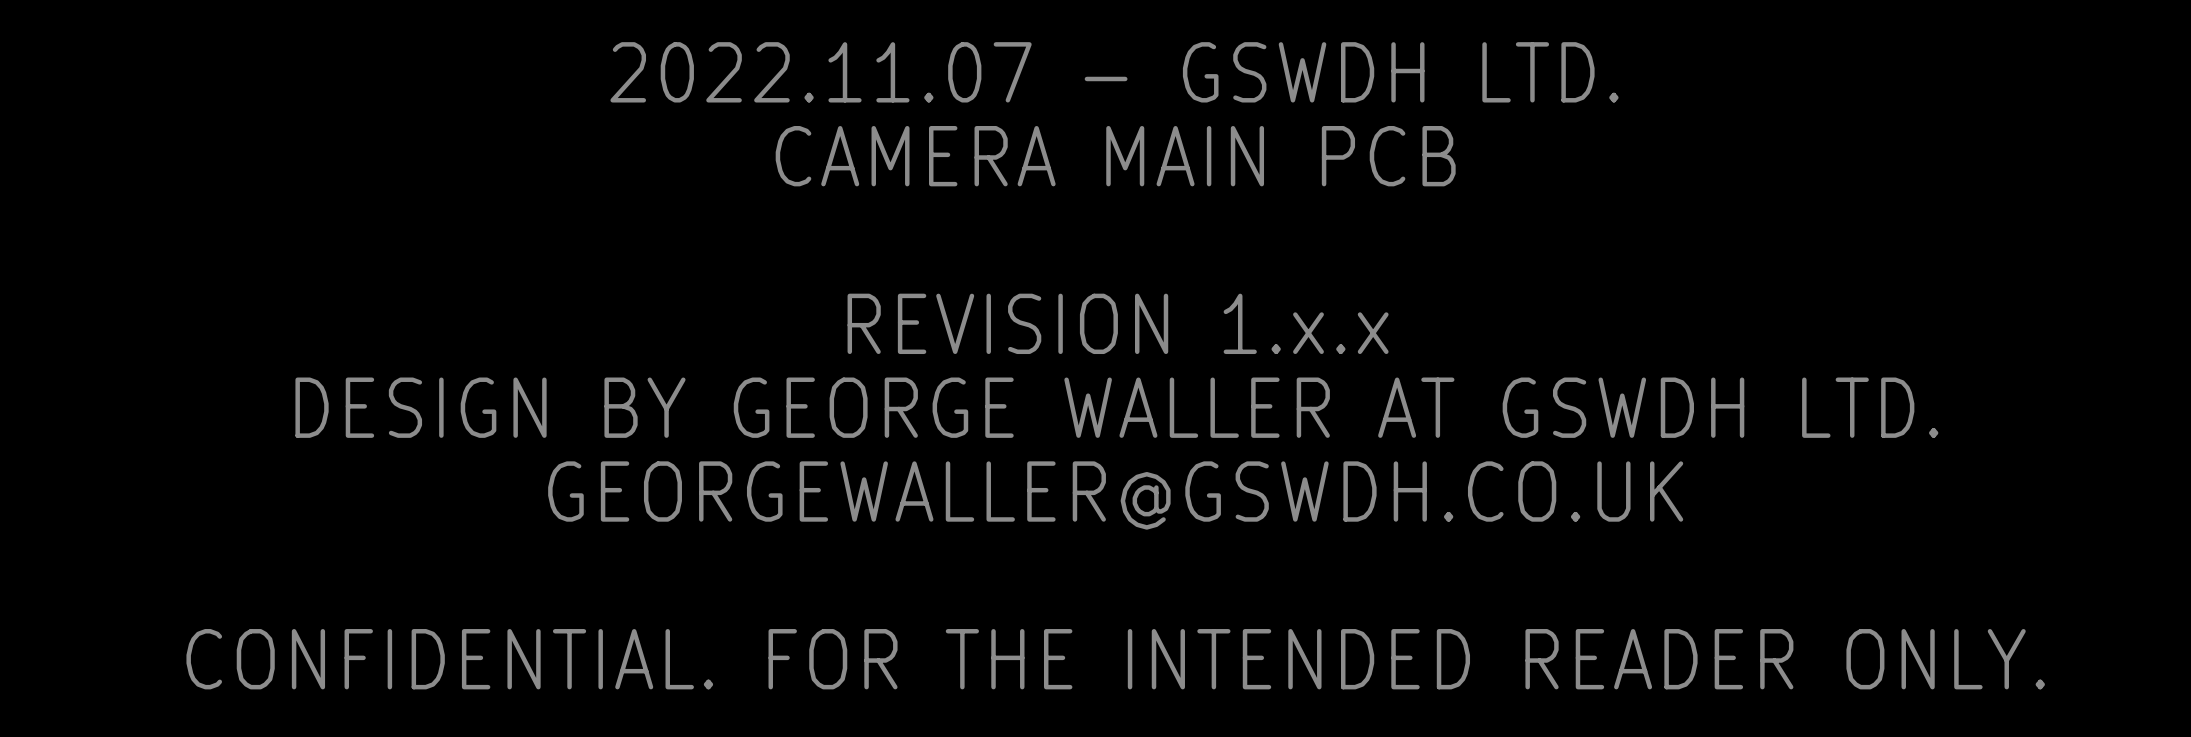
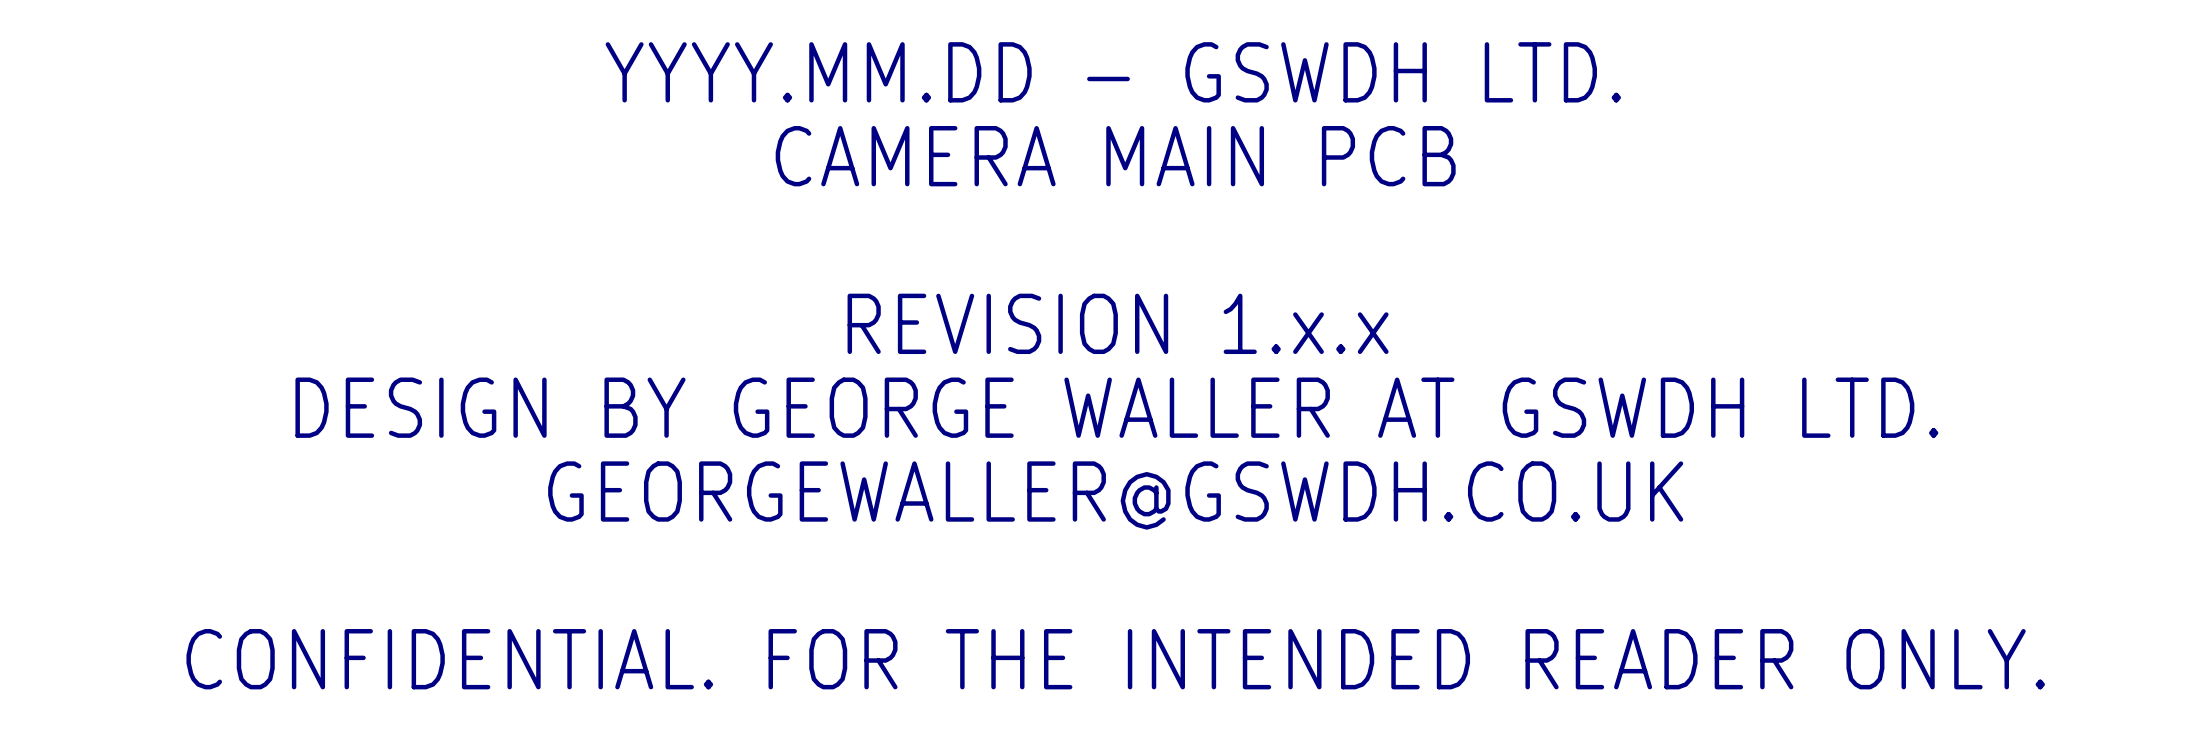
text: 2022.11.07 - GSWDH LTD. (1114, 72) -> YYYY.MM.DD - GSWDH LTD. (1113, 72)

